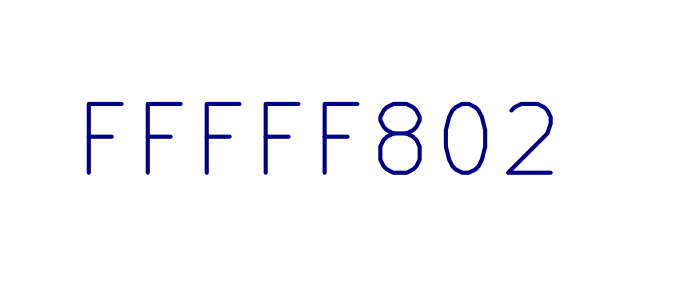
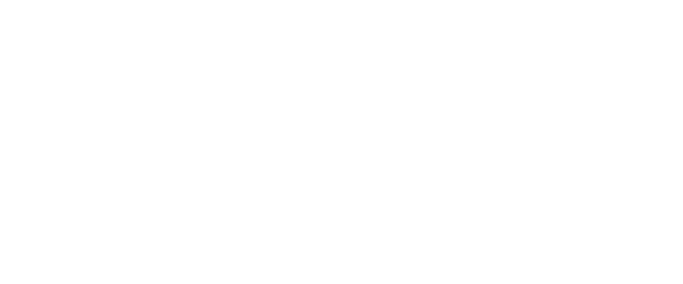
text: FFFFF802 (319, 138) -> none

